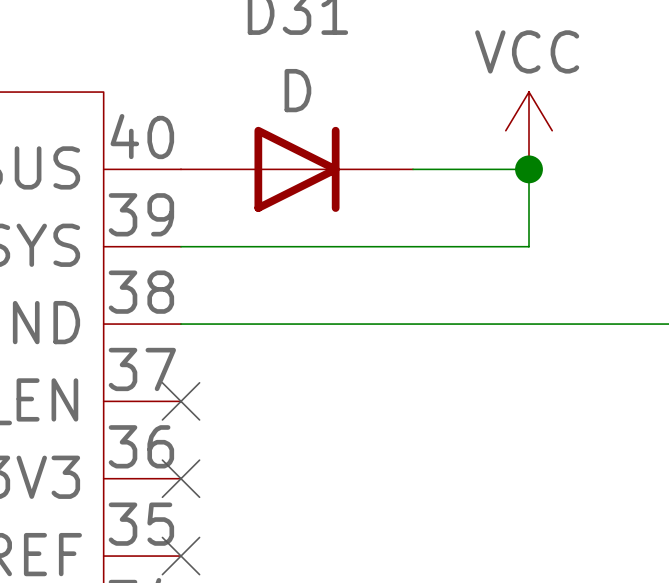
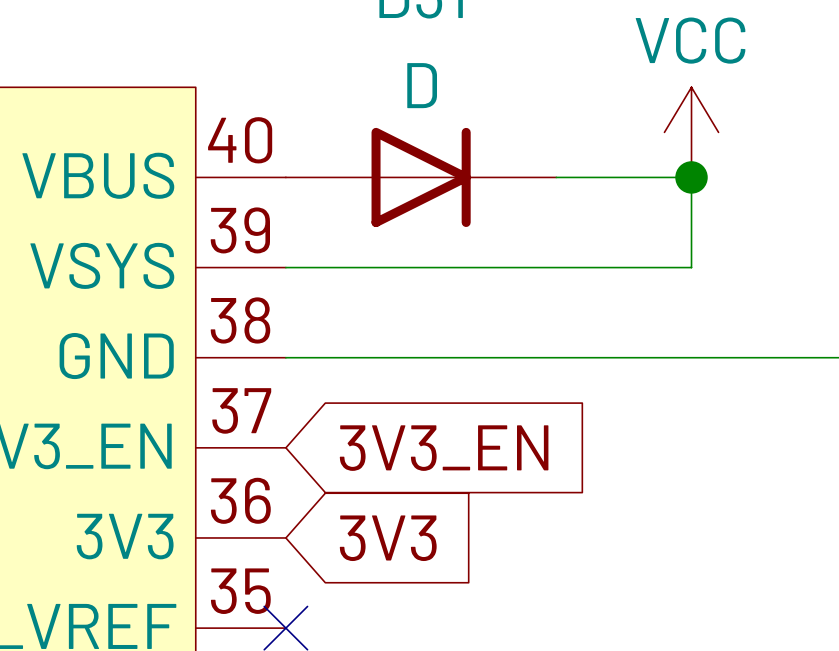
no-connect mark: (181, 401) -> none
global label: none -> 3V3_EN (444, 448)
no-connect mark: (181, 478) -> none
global label: none -> 3V3 (388, 538)

